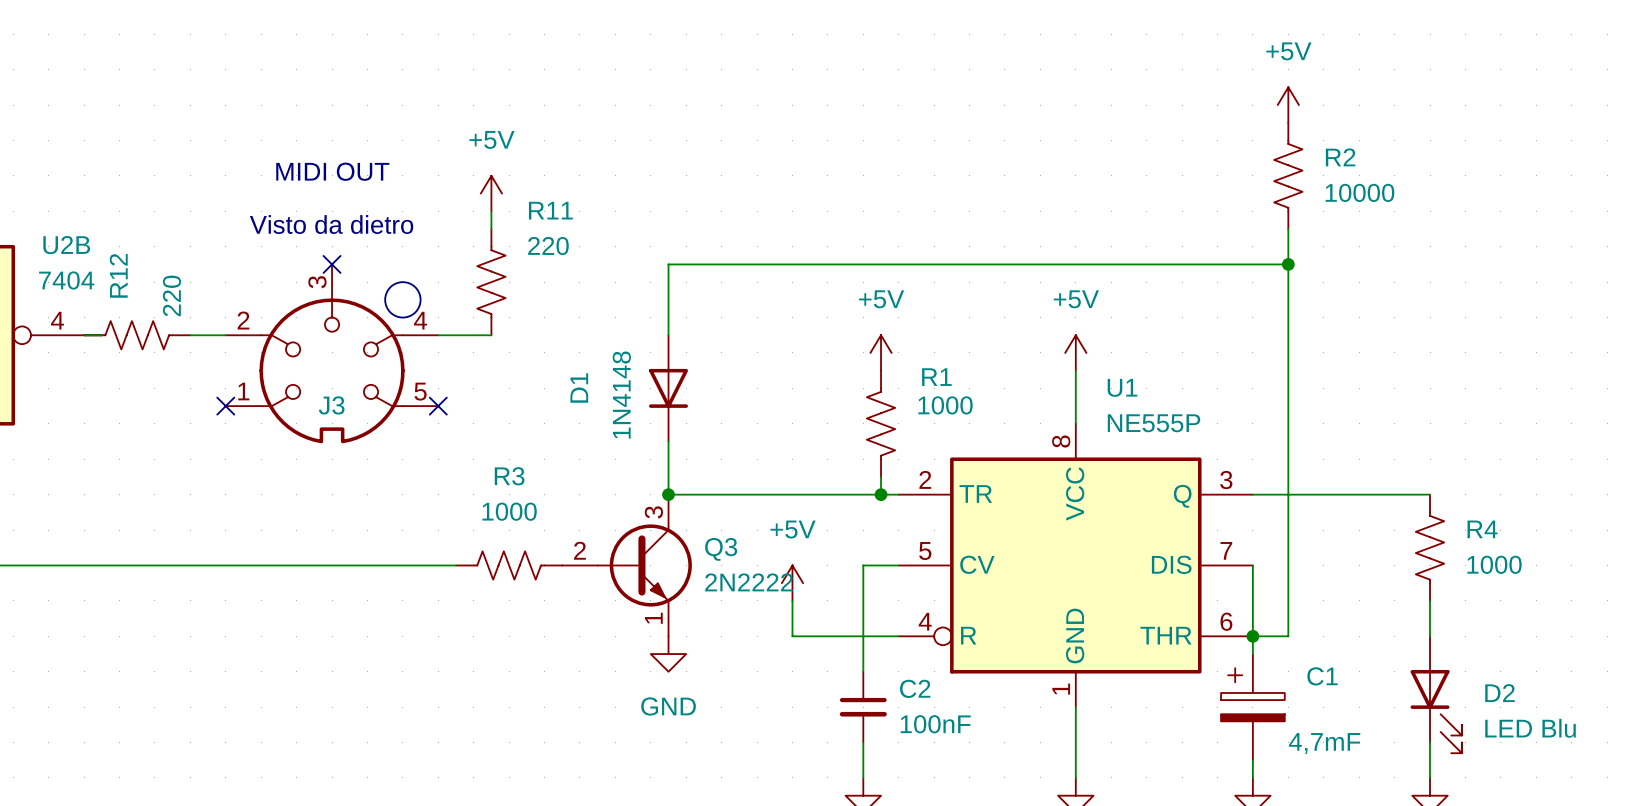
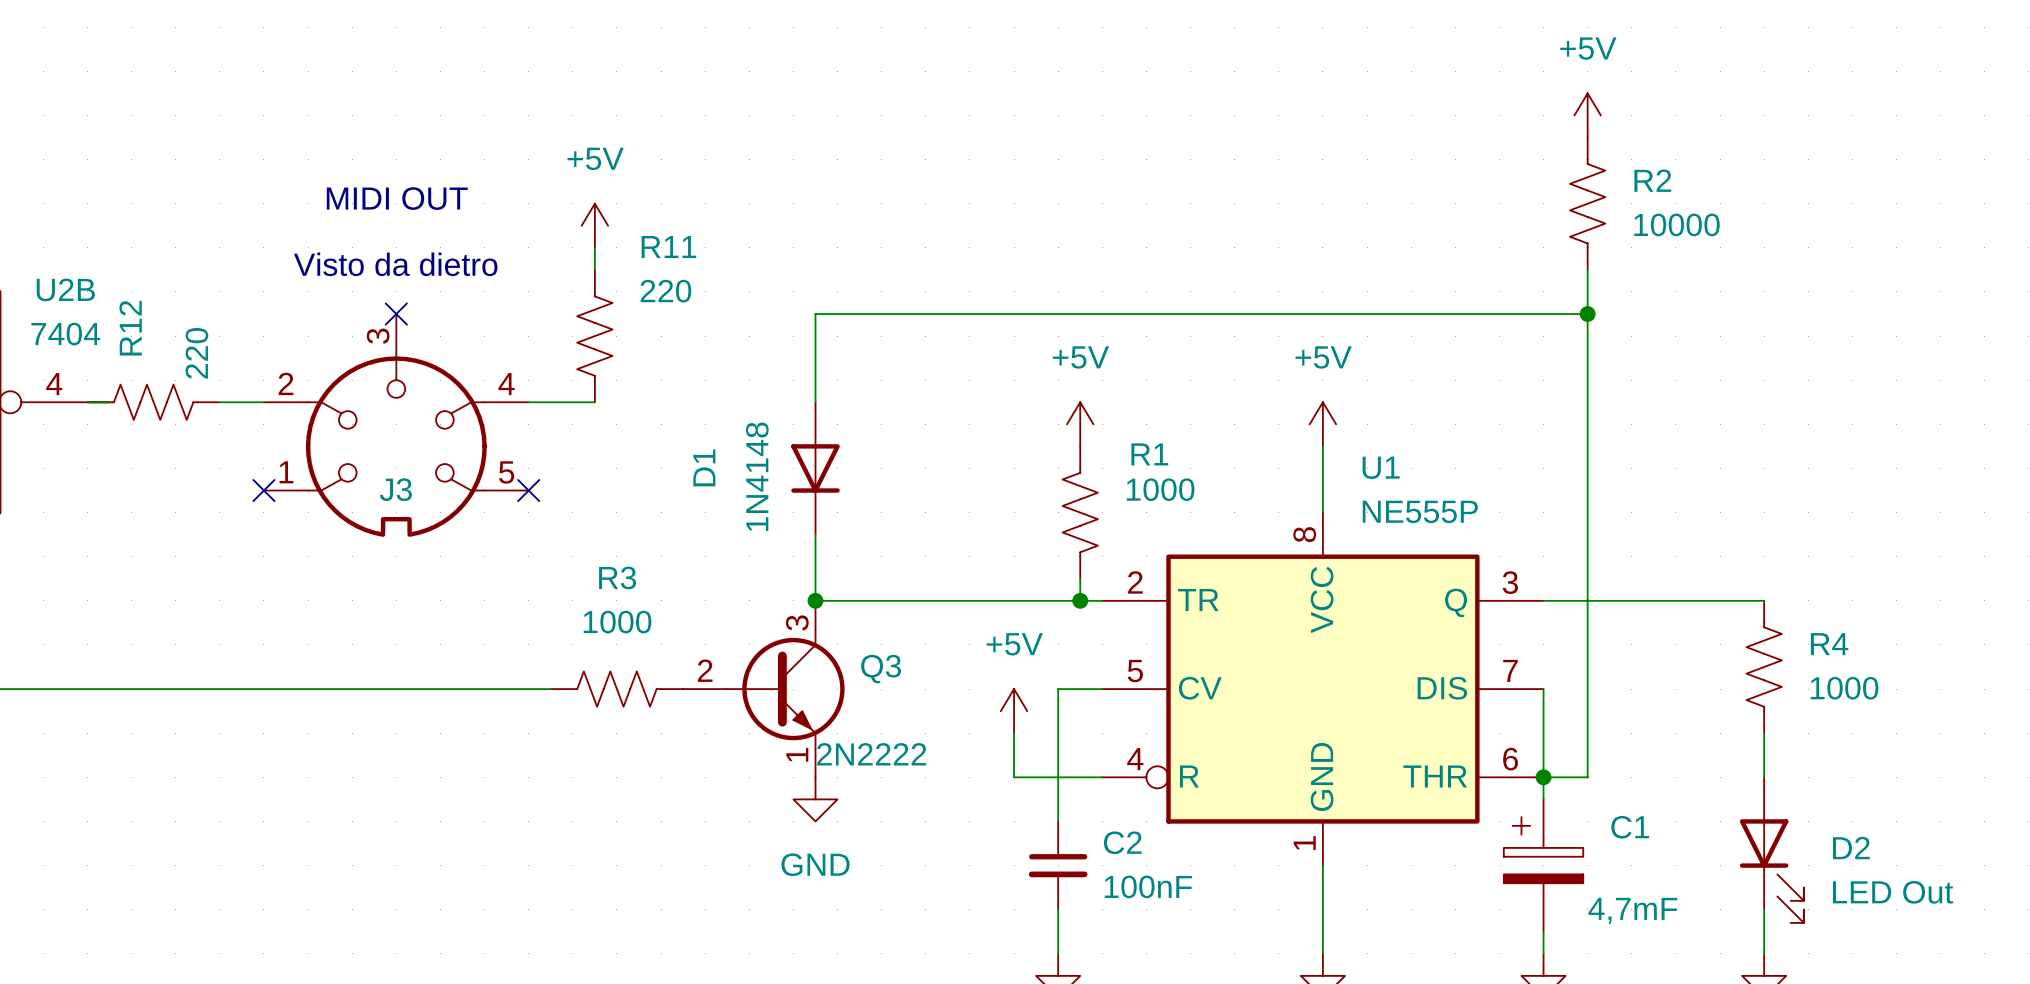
drawing: [385, 282, 421, 318] -> none
Q3 value position: 2N2222 (749, 582) -> 2N2222 (871, 754)
power symbol position: +5V (792, 583) -> +5V (1014, 711)
wire: (792, 600) (792, 636) (827, 636) -> (1014, 733) (1014, 777)
D2 value: LED Blu (1530, 728) -> LED Out (1893, 892)

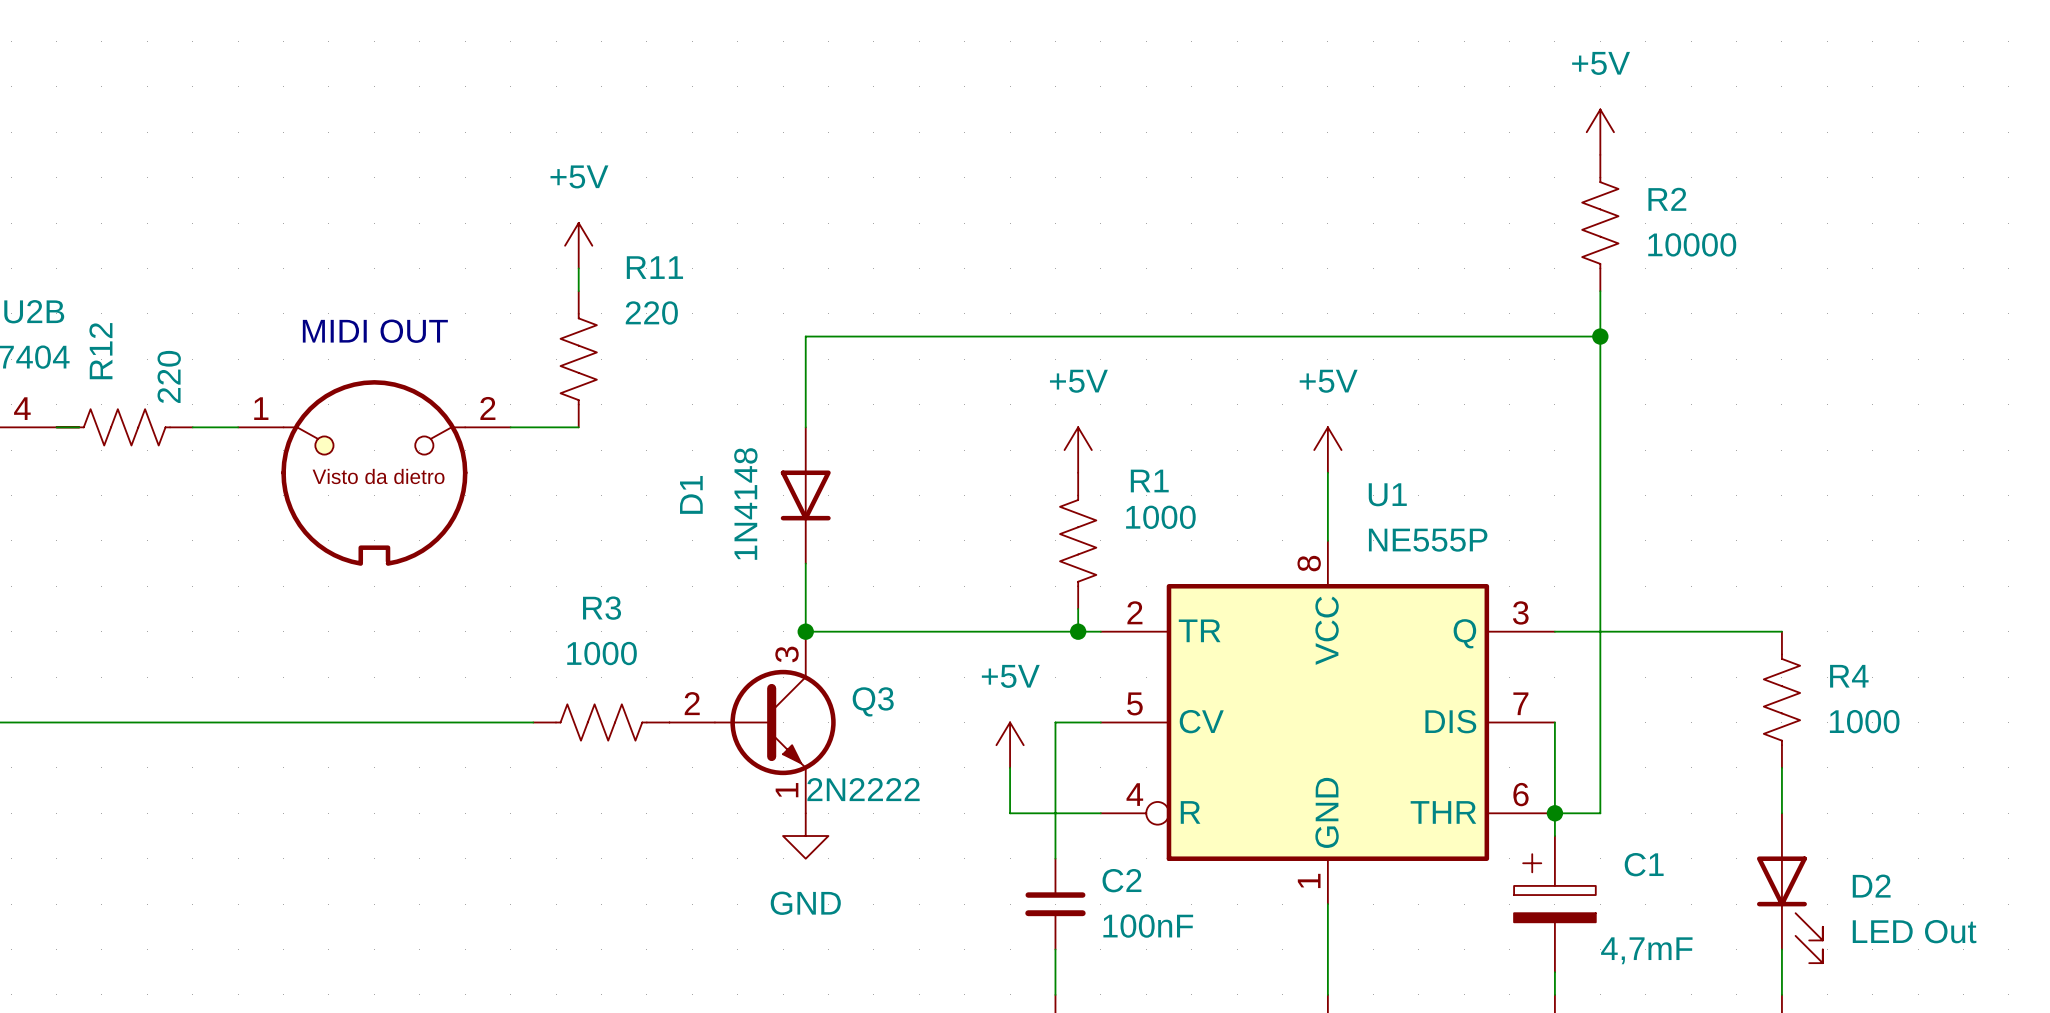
text position: MIDI OUT (397, 198) -> MIDI OUT (375, 331)
text: Visto da dietro (395, 264) -> none
no-connect mark: (396, 314) -> none
J3: (396, 425) -> none
part: none -> (374, 472)
no-connect mark: (263, 490) -> none
no-connect mark: (528, 490) -> none

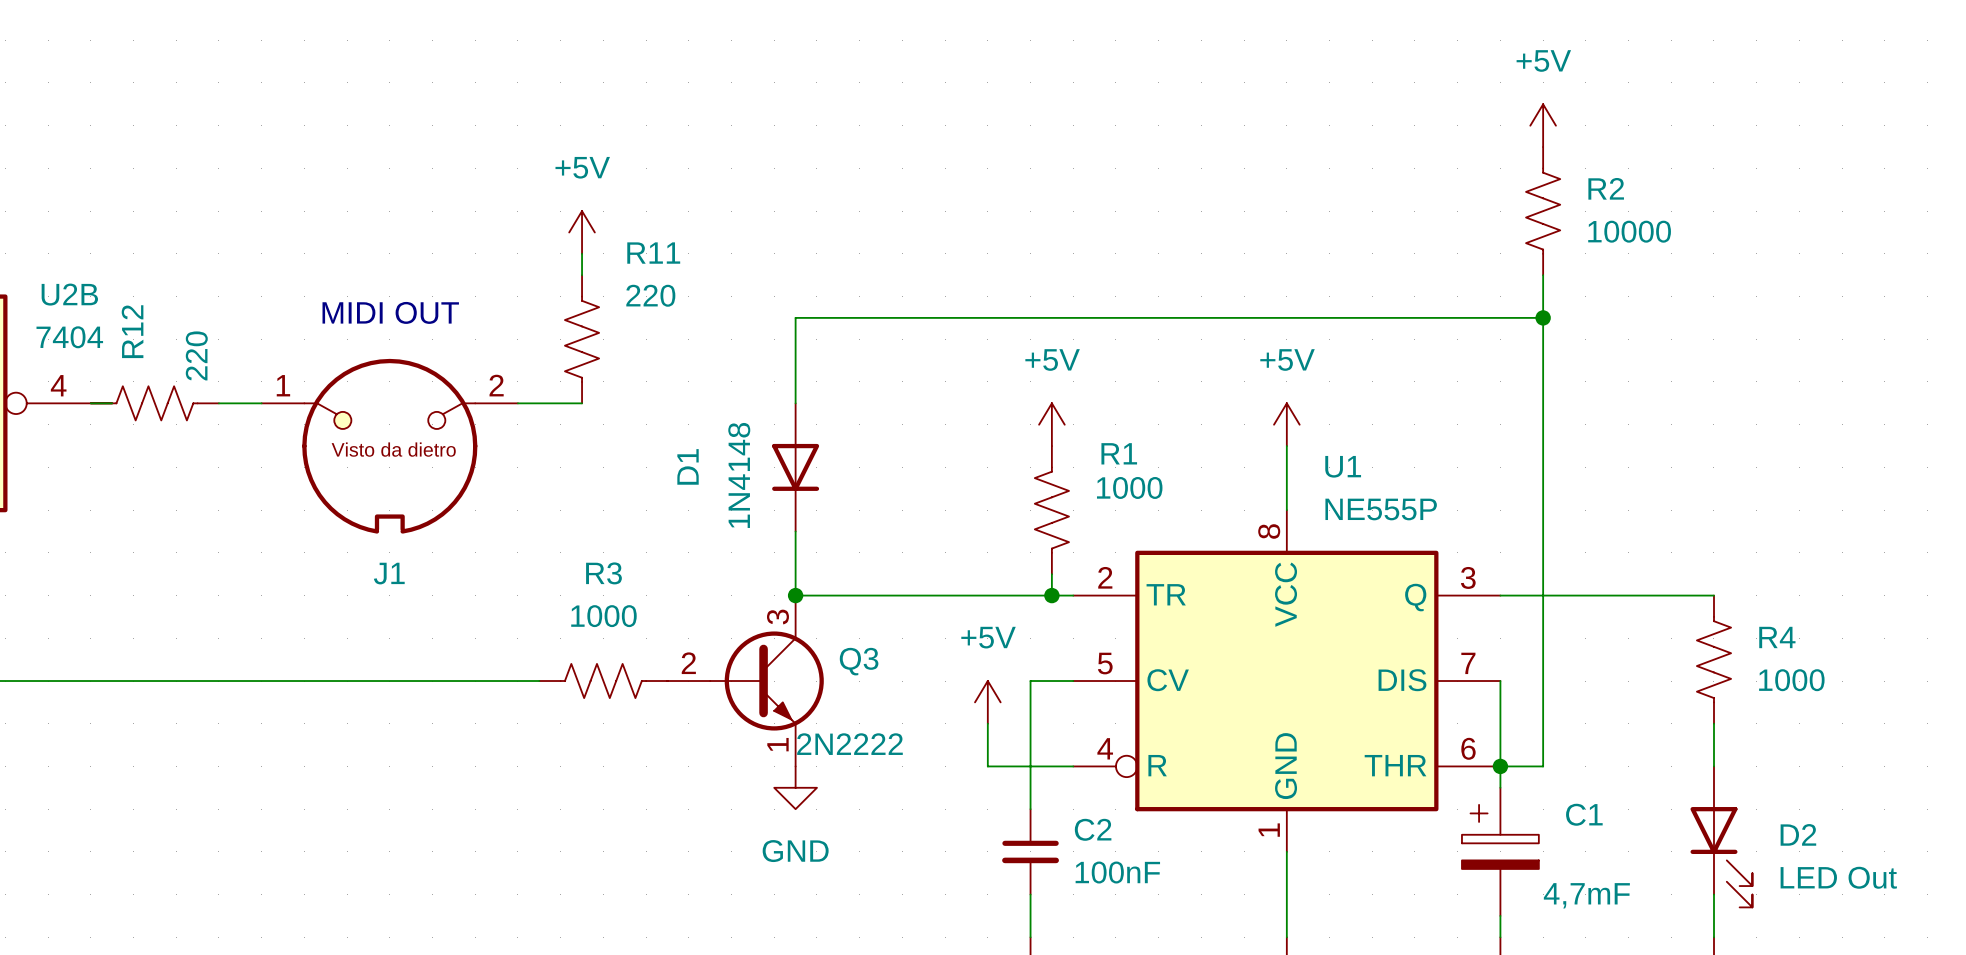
J1 name: none -> J1 (389, 573)

